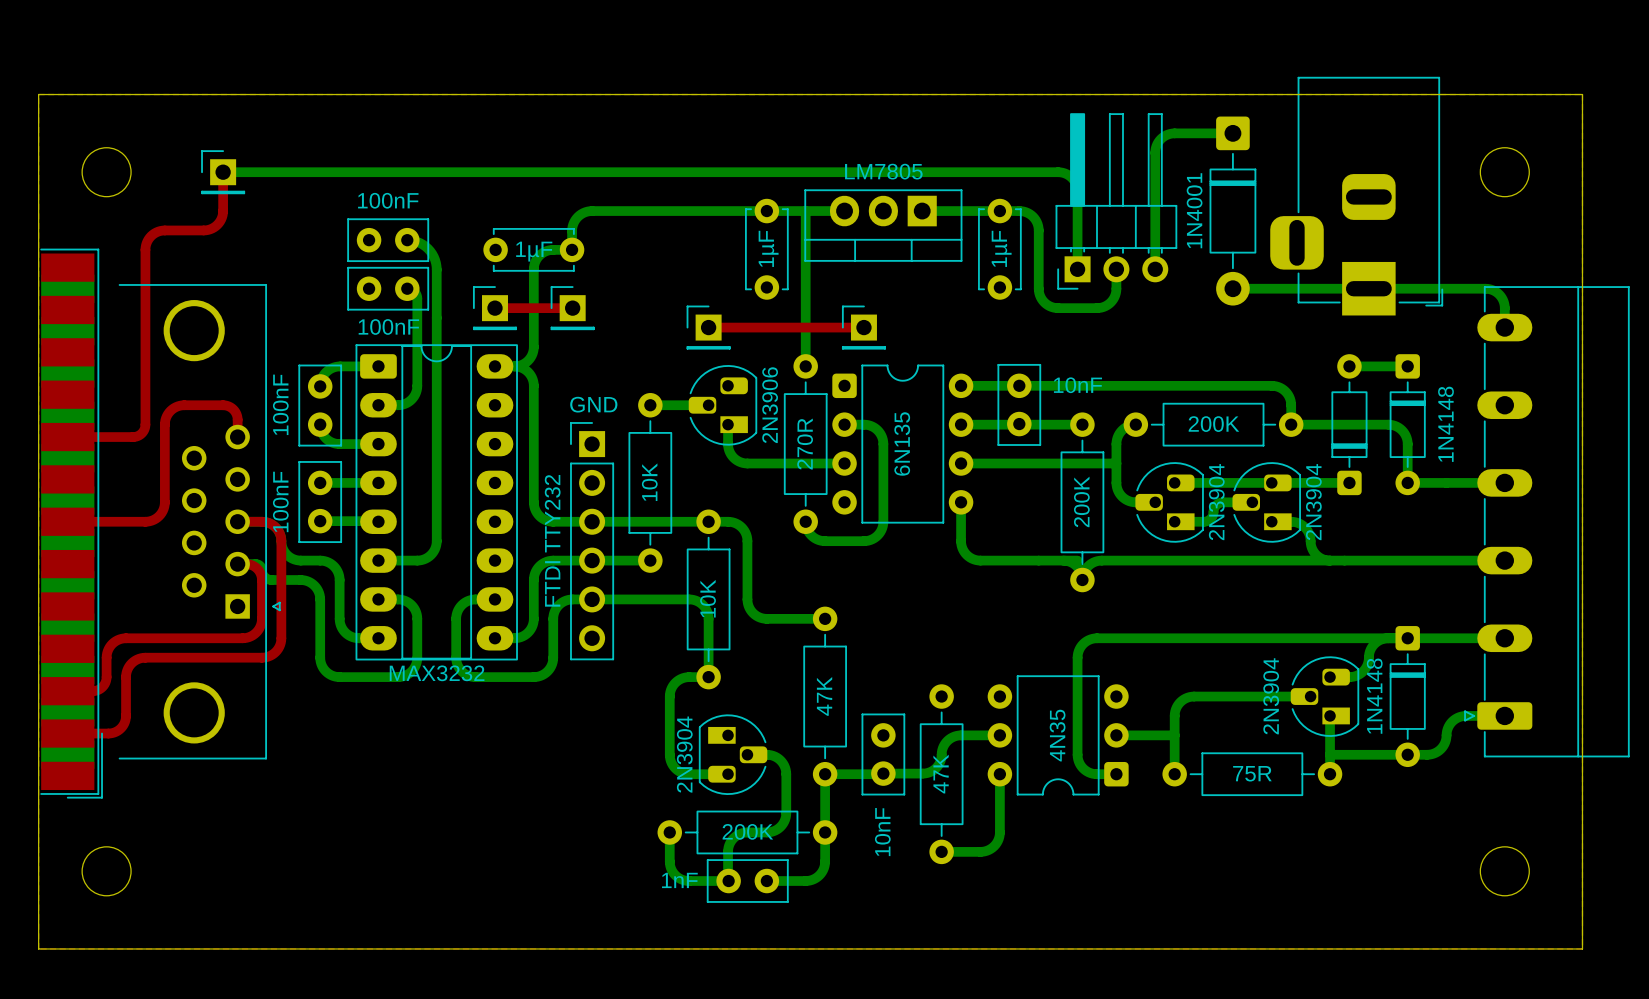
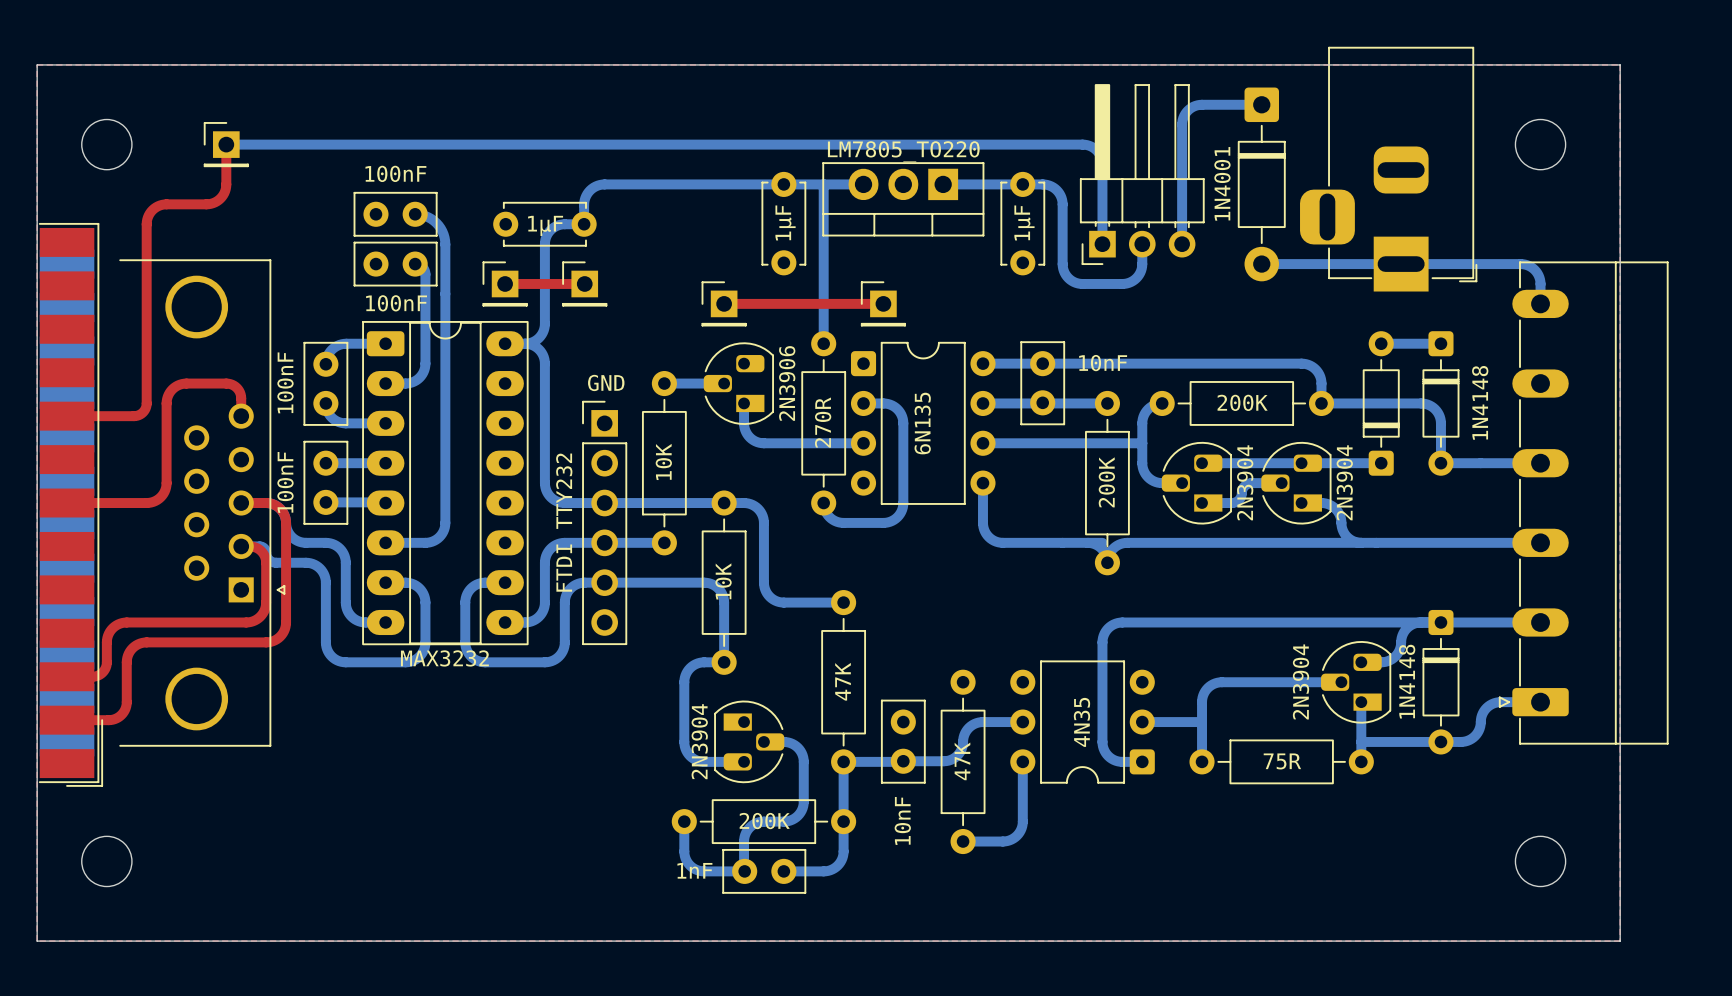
part text: LM7805 (883, 171) -> none
part value: none -> LM7805_TO220 (903, 151)

